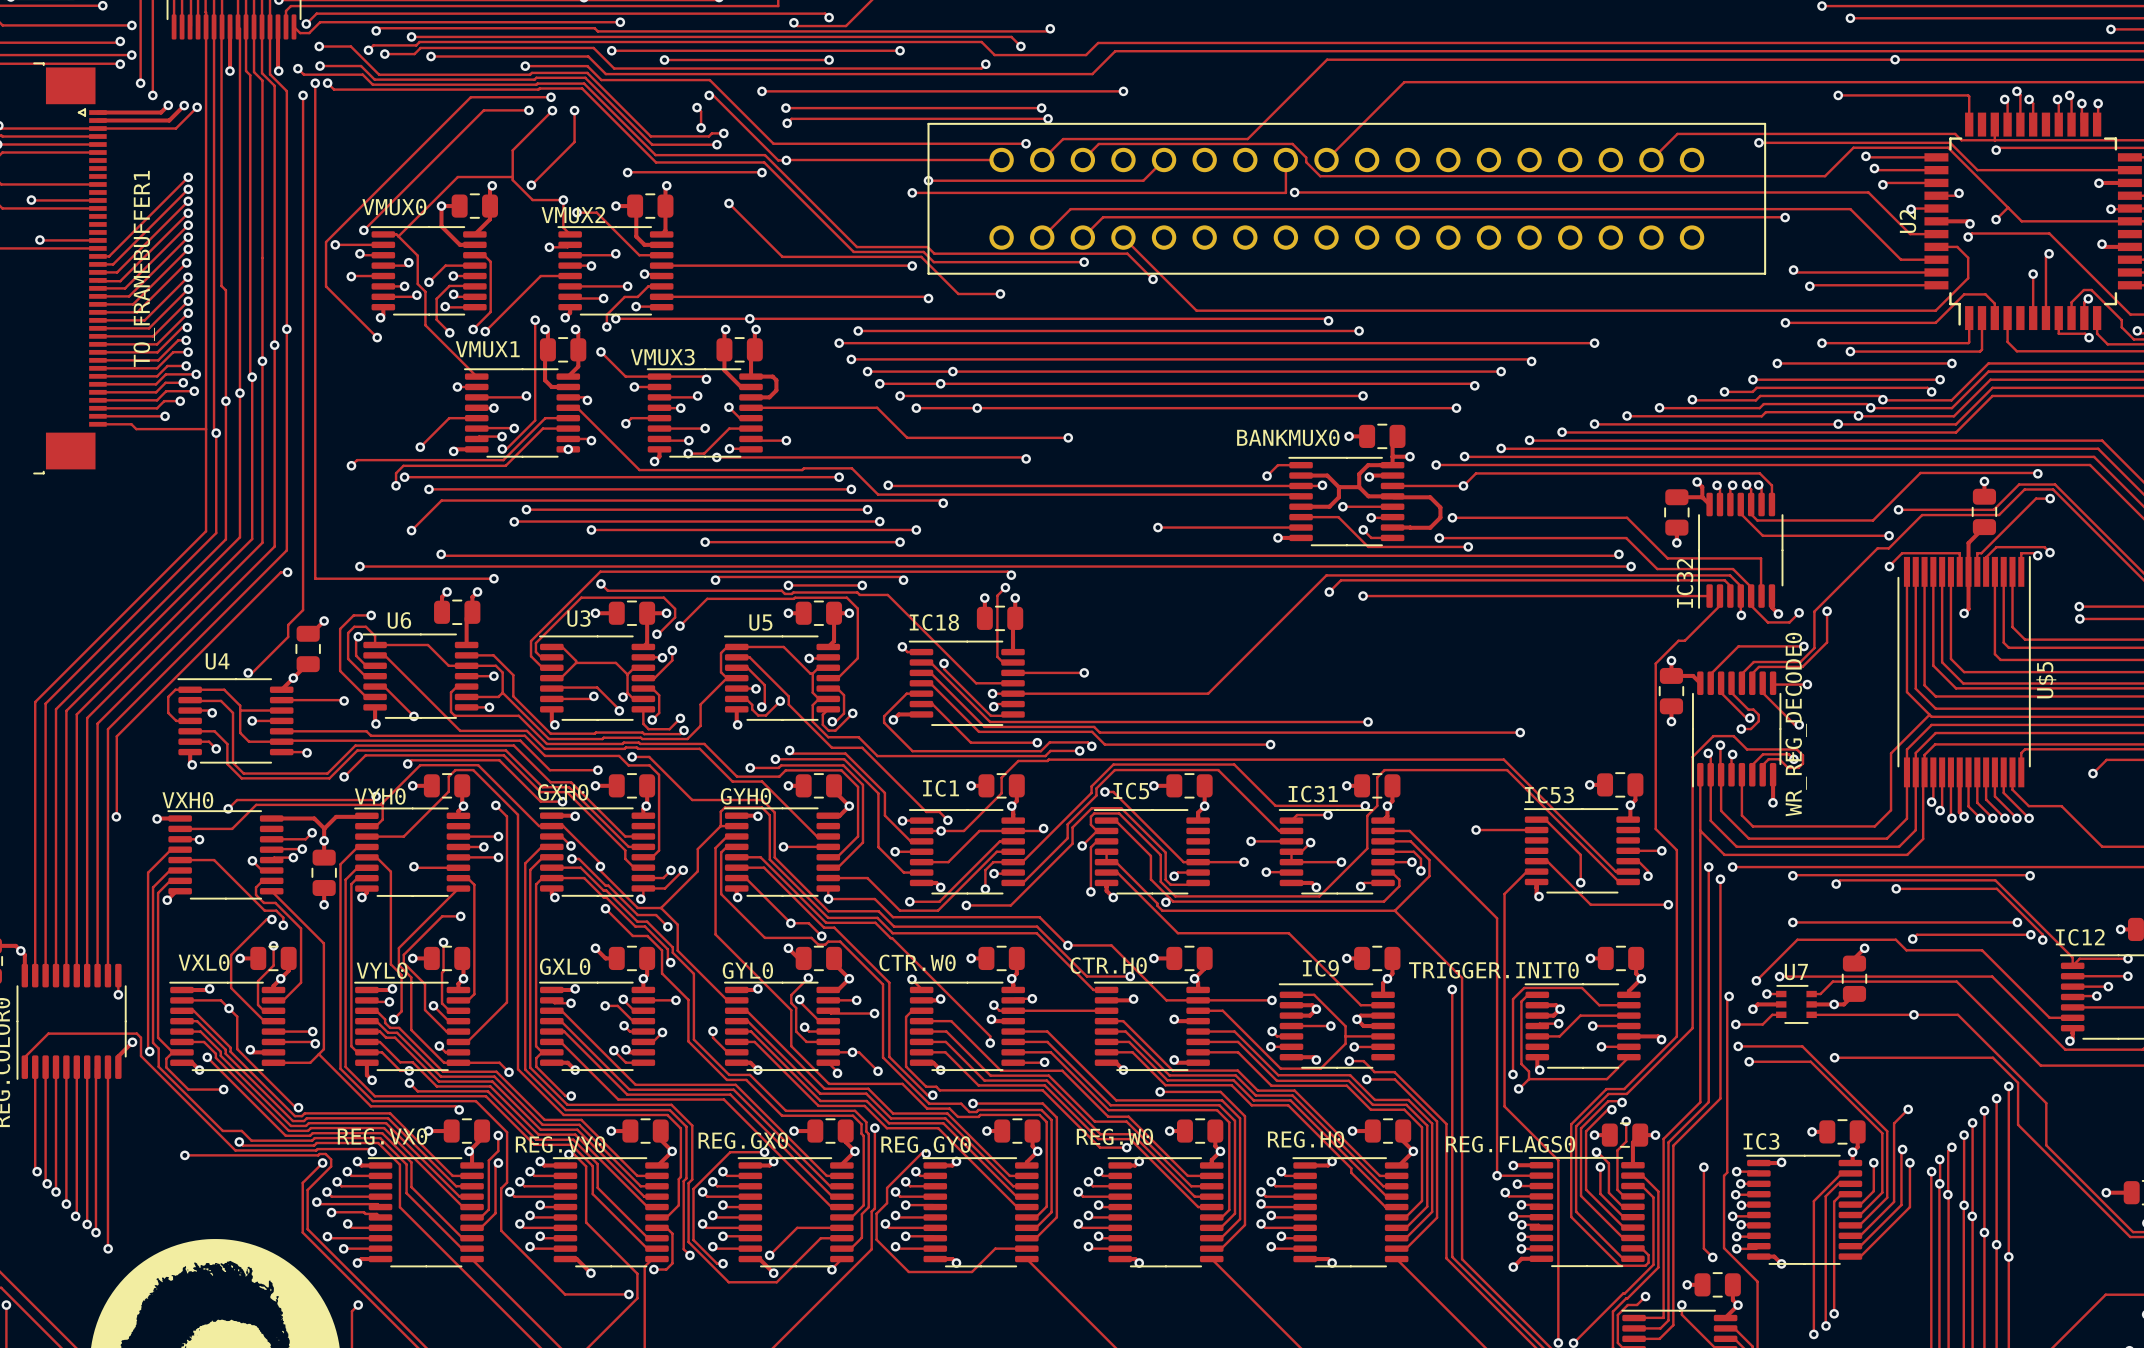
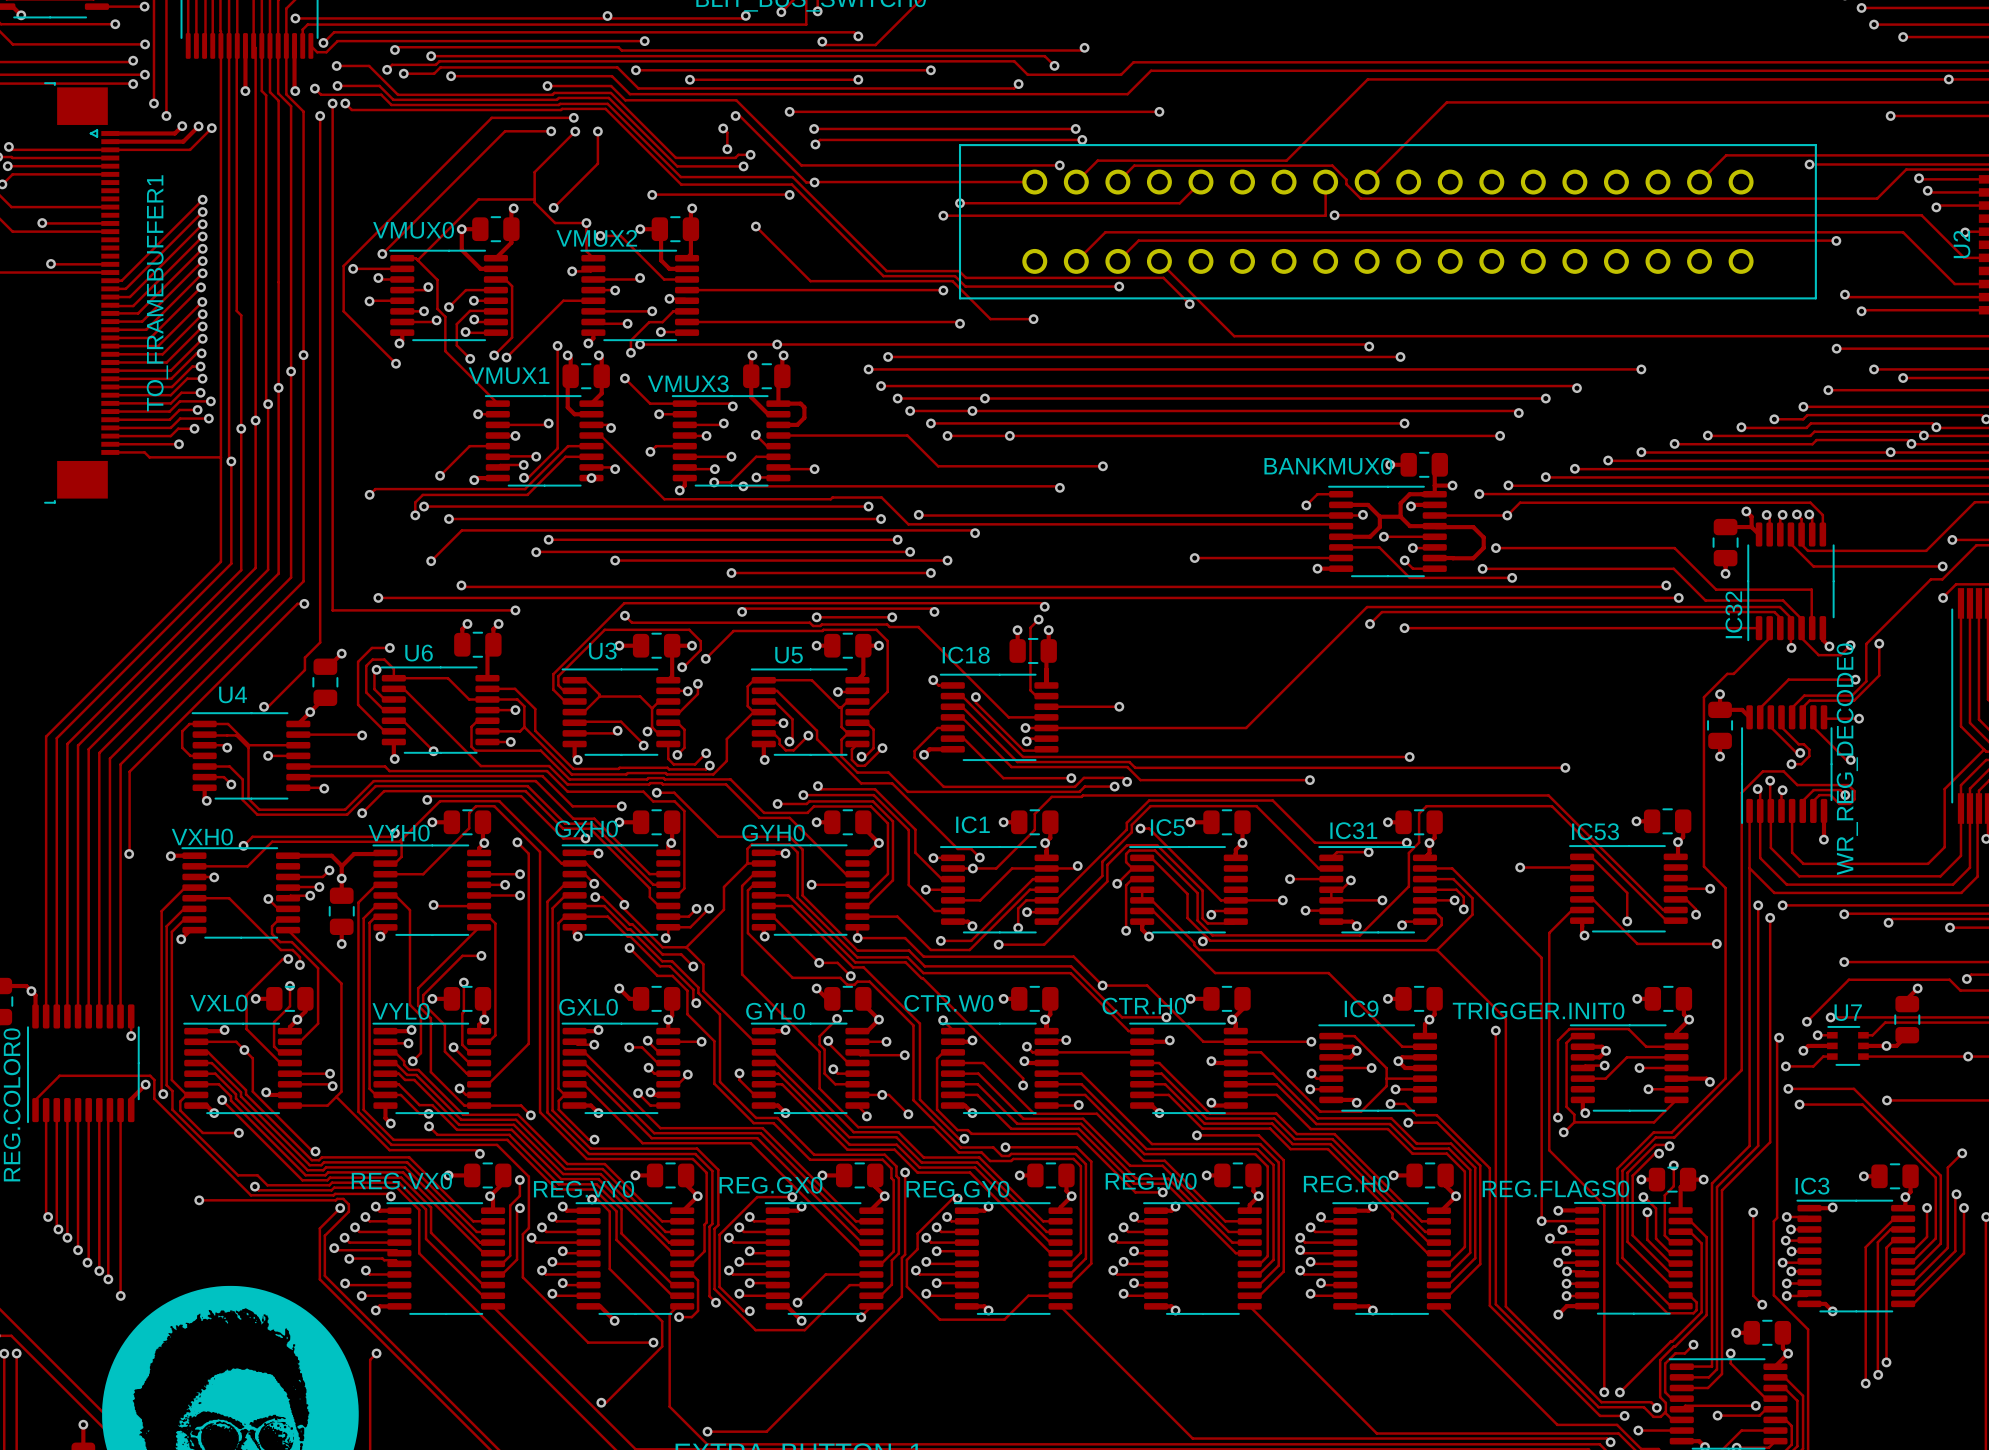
track: (213, 689) (224, 689) (240, 705) (240, 732) (249, 741) (281, 741) -> (228, 723) (249, 745) (255, 745)

